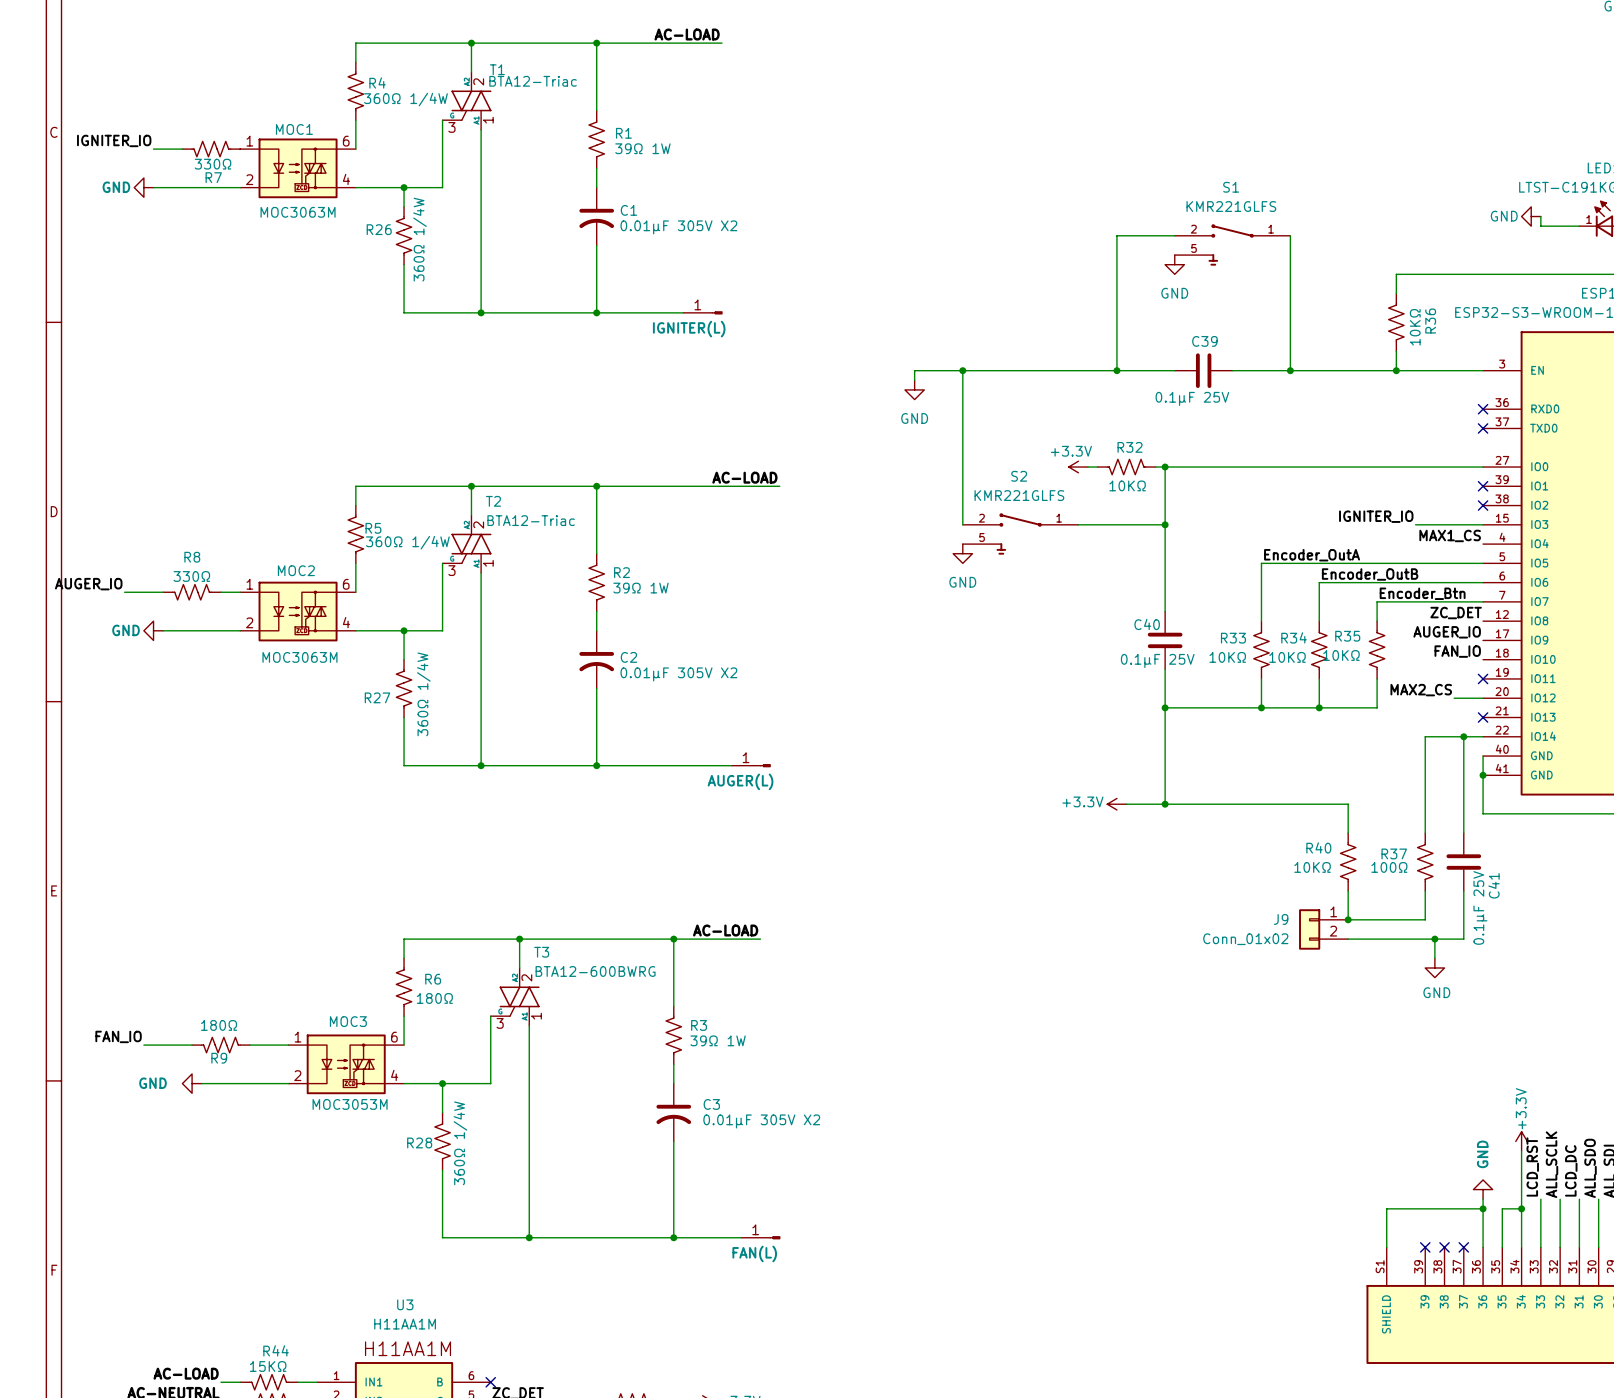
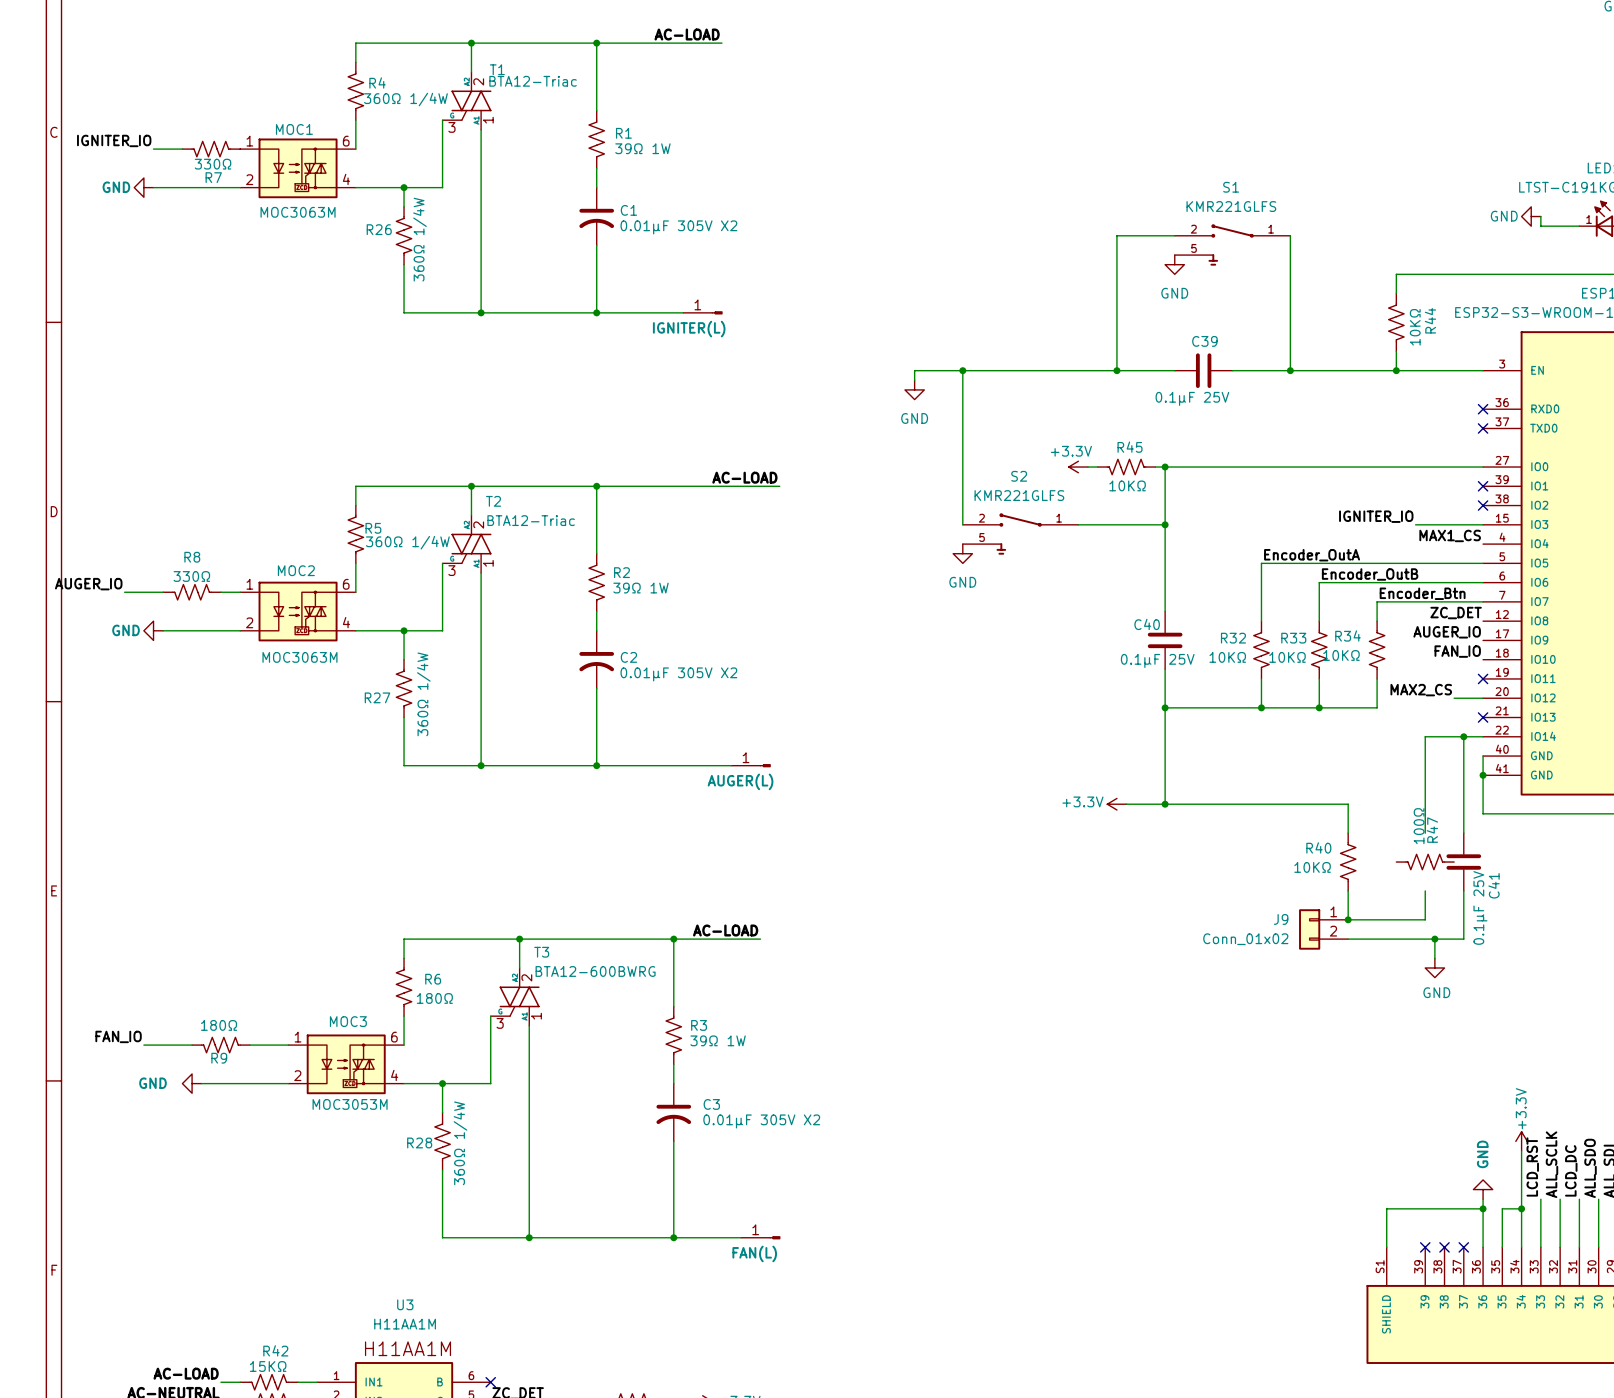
R36 name: R36 (1430, 321) -> R44 (1430, 320)
R32 name: R32 (1130, 447) -> R45 (1130, 447)
R35 name: R35 (1347, 636) -> R34 (1347, 635)
R34 name: R34 (1294, 637) -> R33 (1293, 638)
R33 name: R33 (1233, 638) -> R32 (1233, 638)
R37: 100Ω (1425, 862) -> none
R47: none -> 100Ω (1425, 862)
R44 name: R44 (276, 1350) -> R42 (275, 1350)

